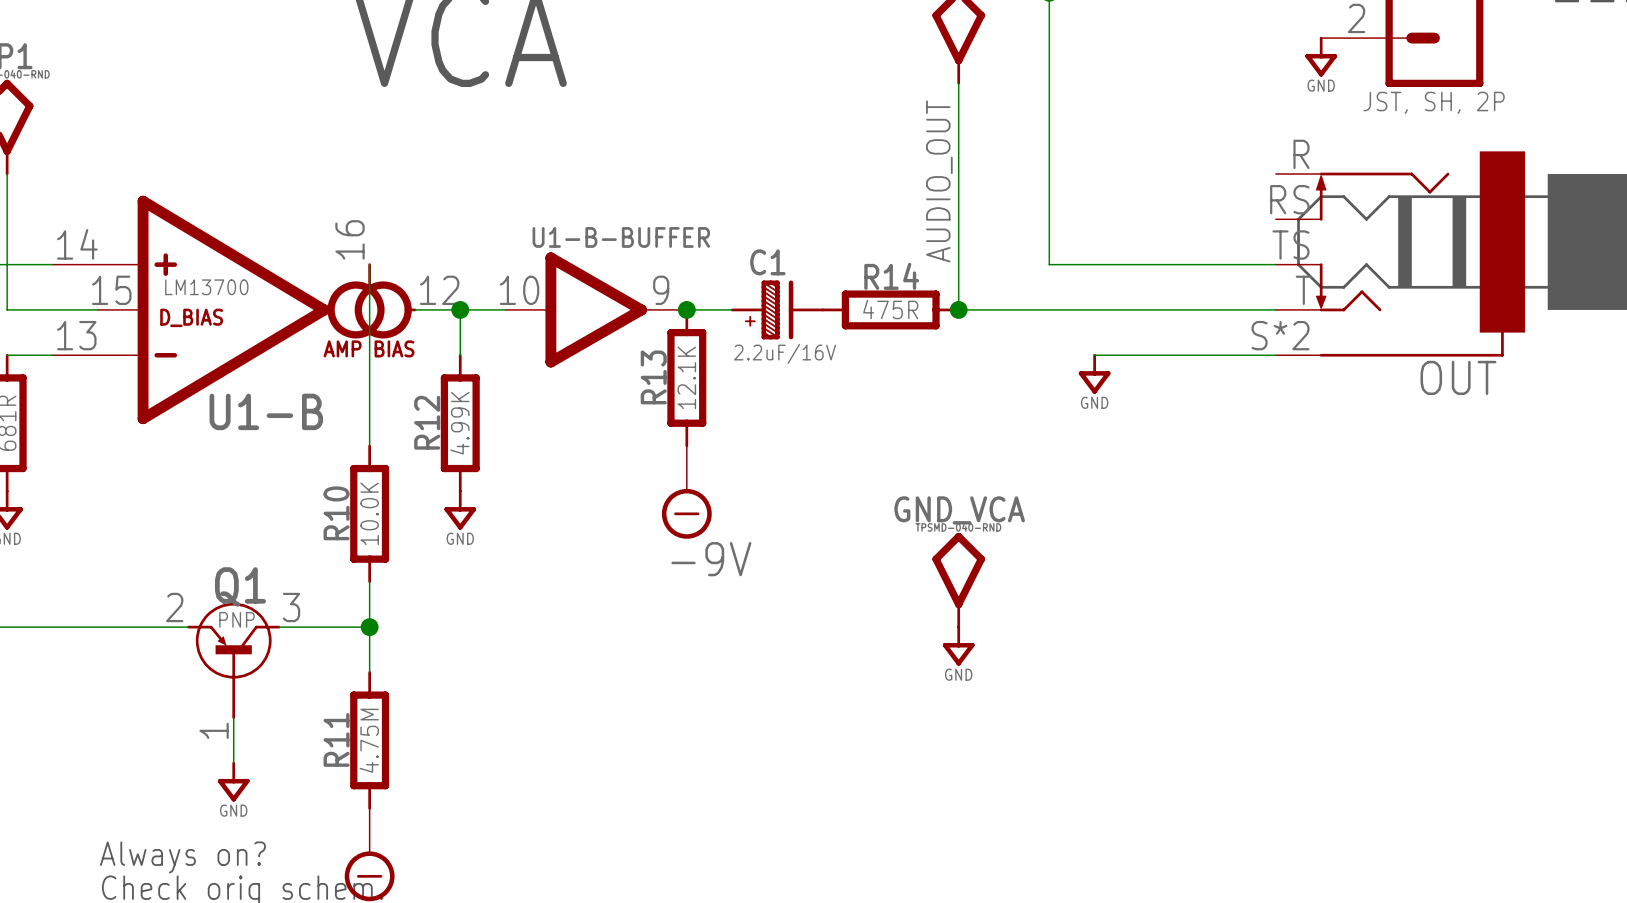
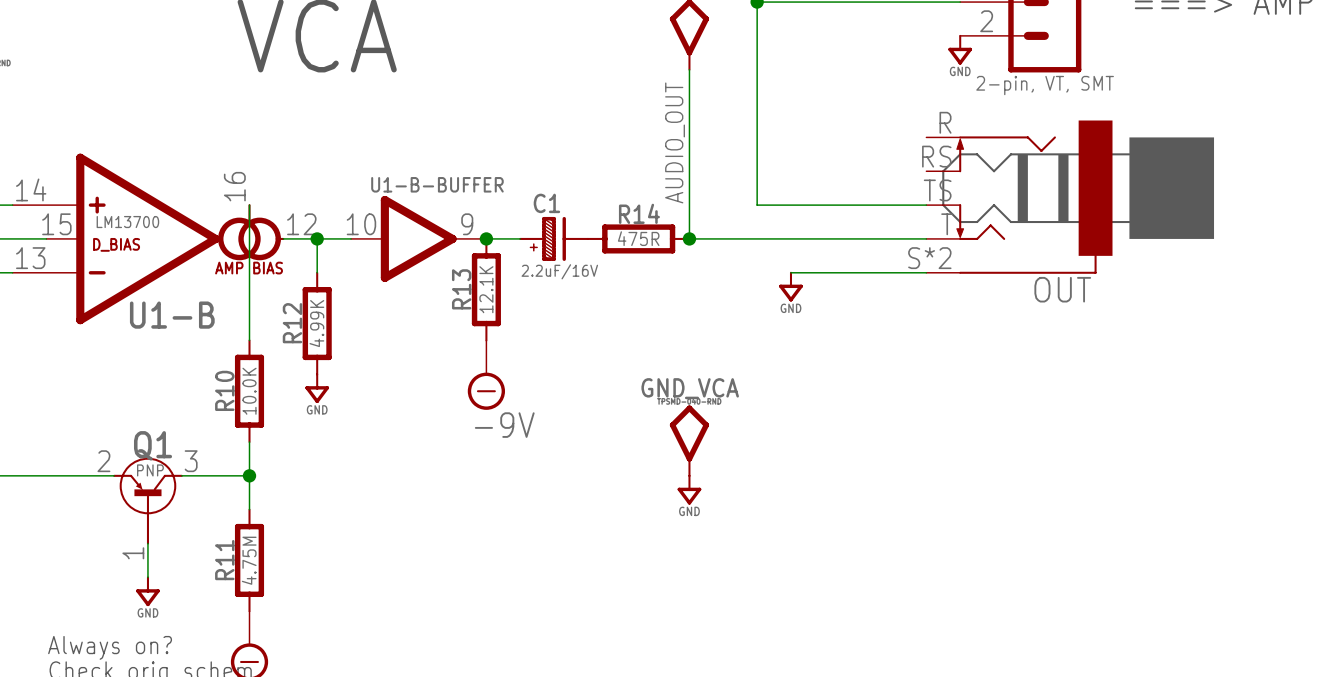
part value: JST, SH, 2P (1434, 102) -> 2-pin, VT, SMT (1045, 85)

